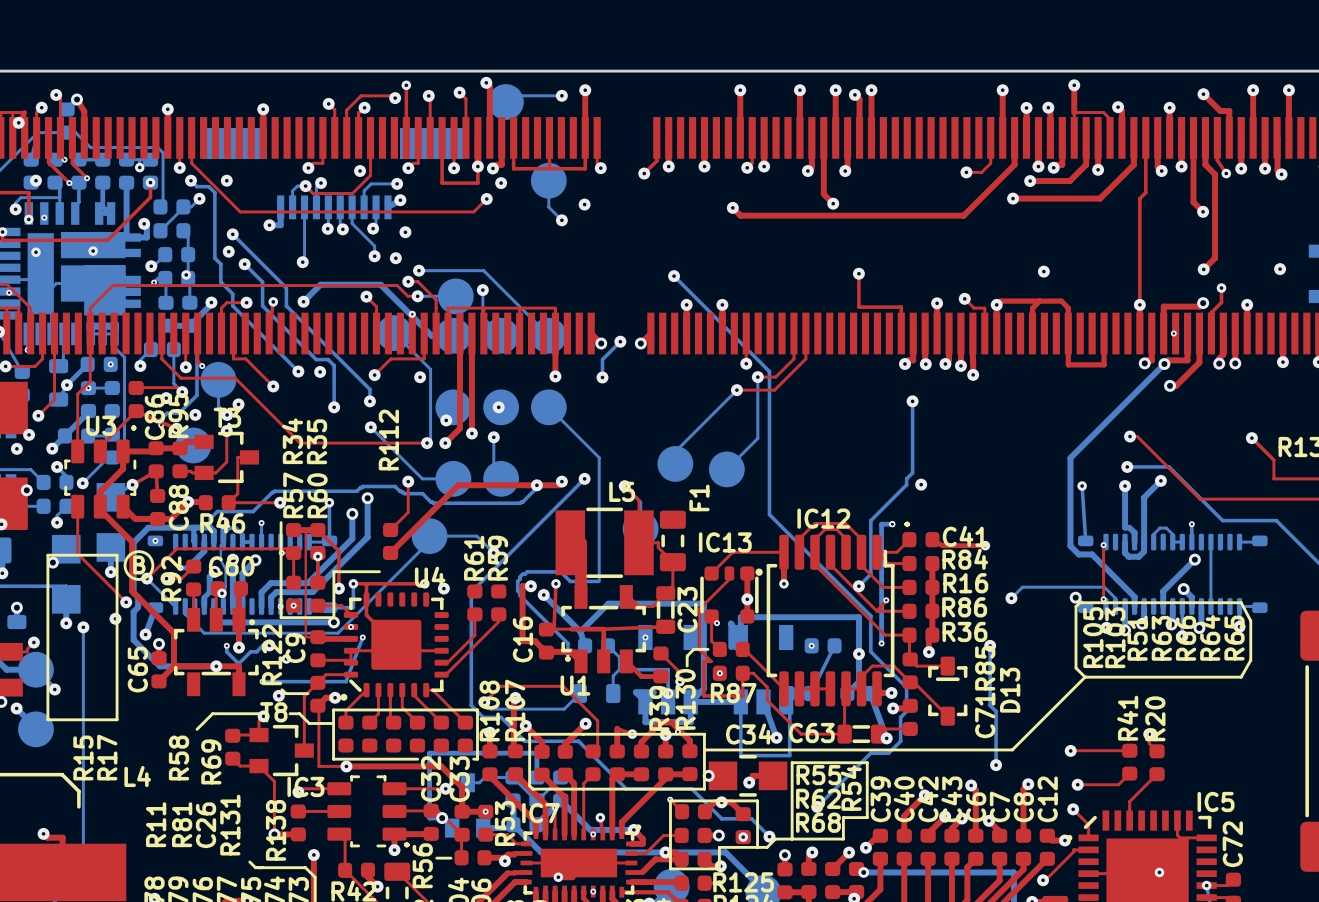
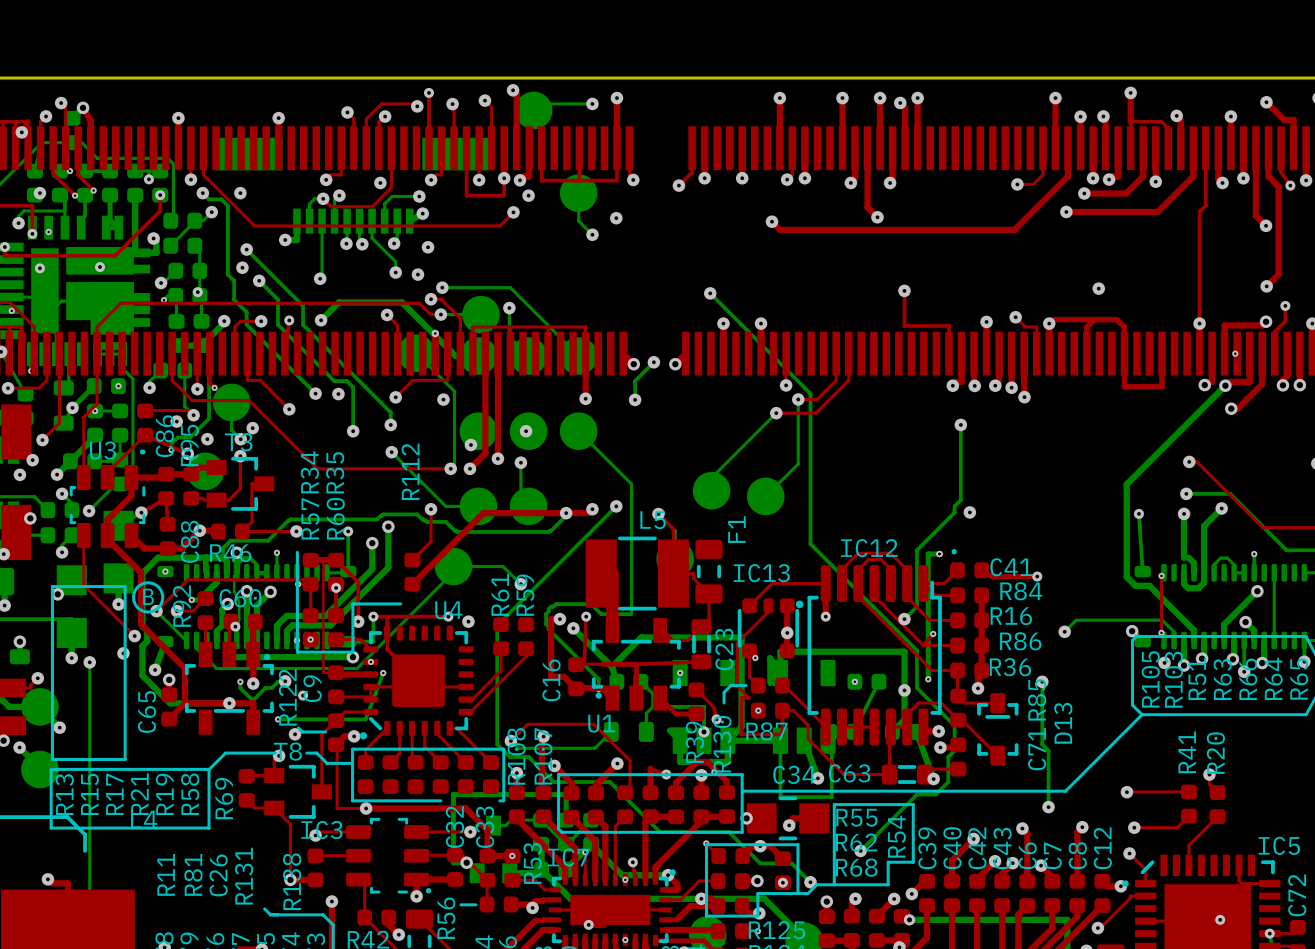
line: none -> (51, 769) (209, 769) (209, 828) (51, 828) (51, 769)
R13 name: none -> R13 (64, 794)
R21 name: none -> R21 (139, 794)
R19 name: none -> R19 (164, 794)

